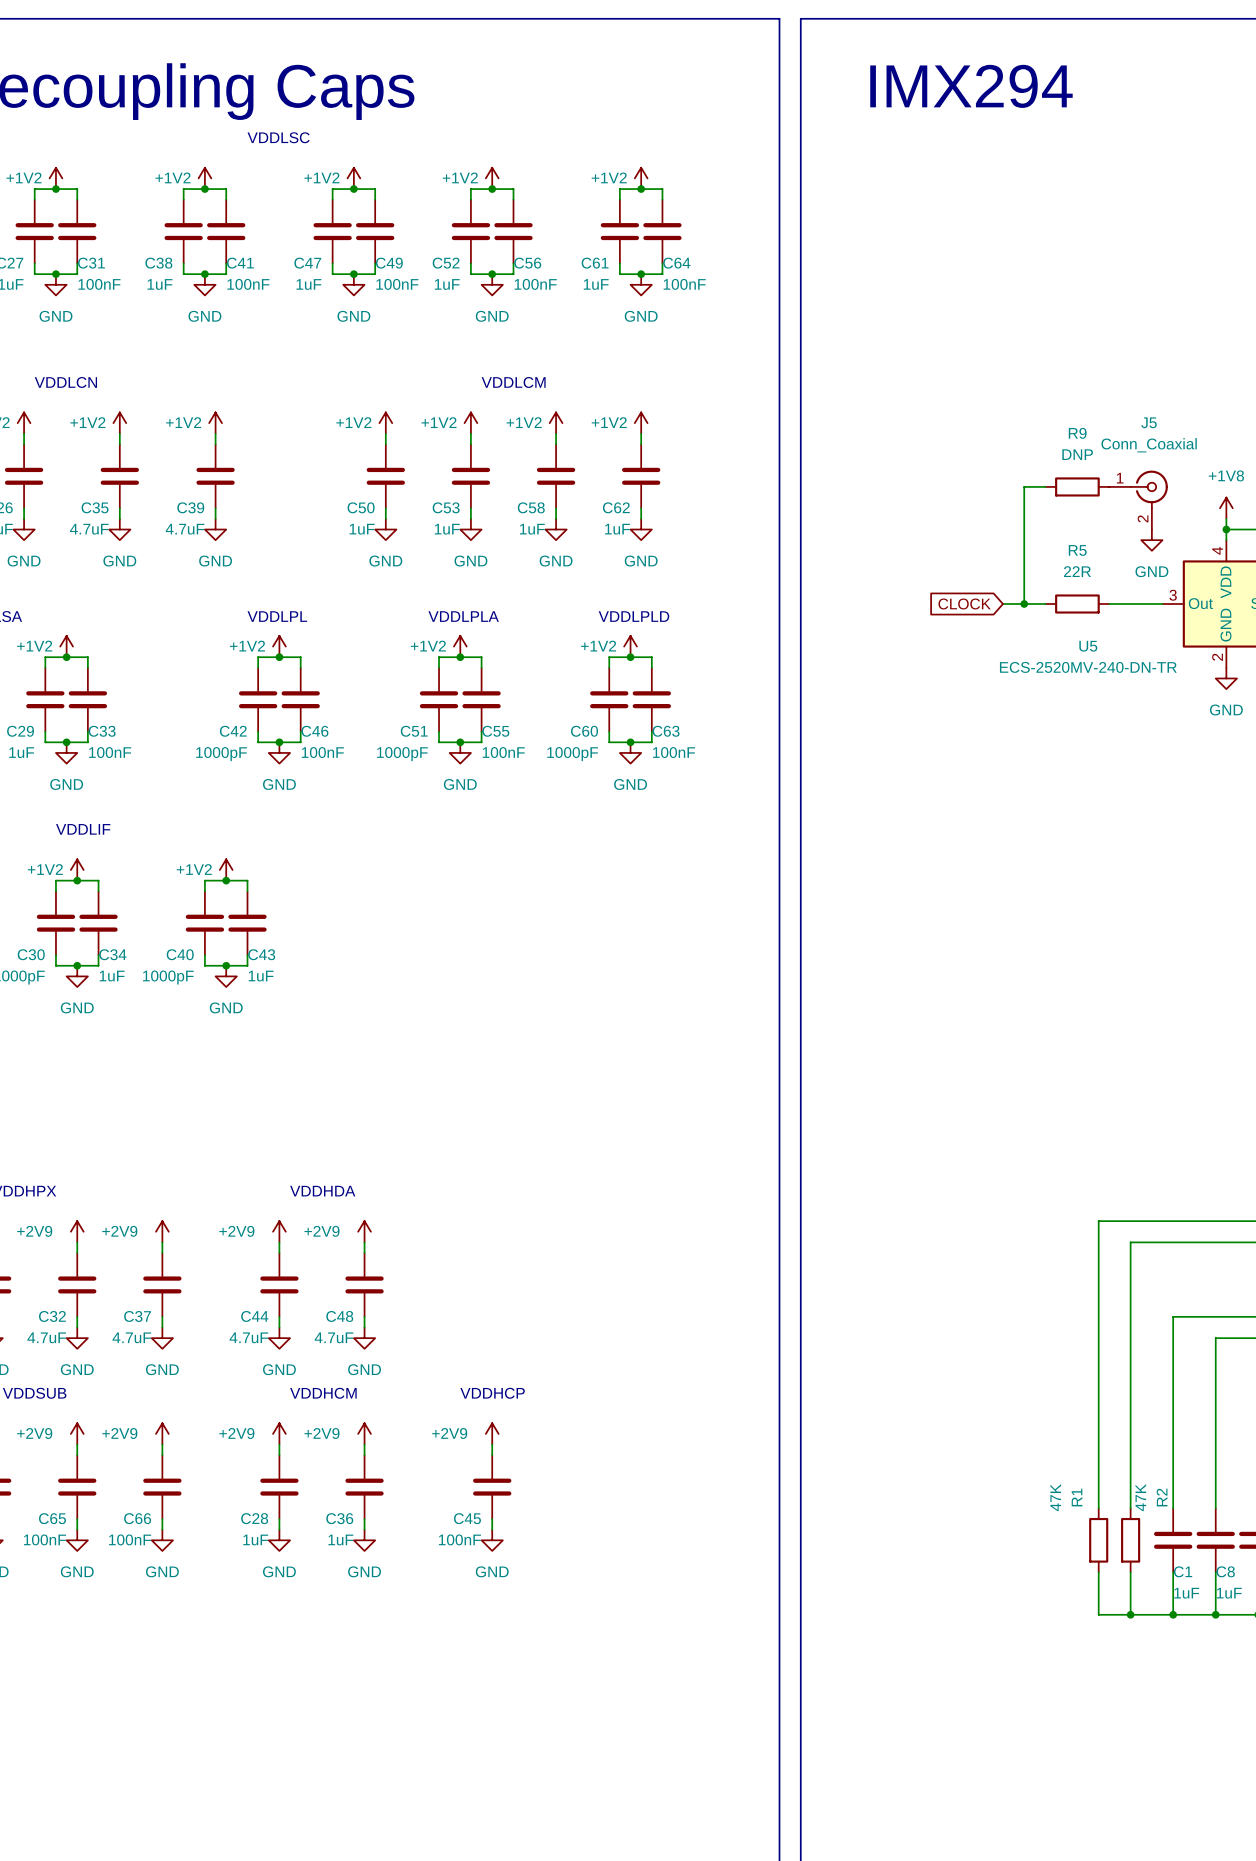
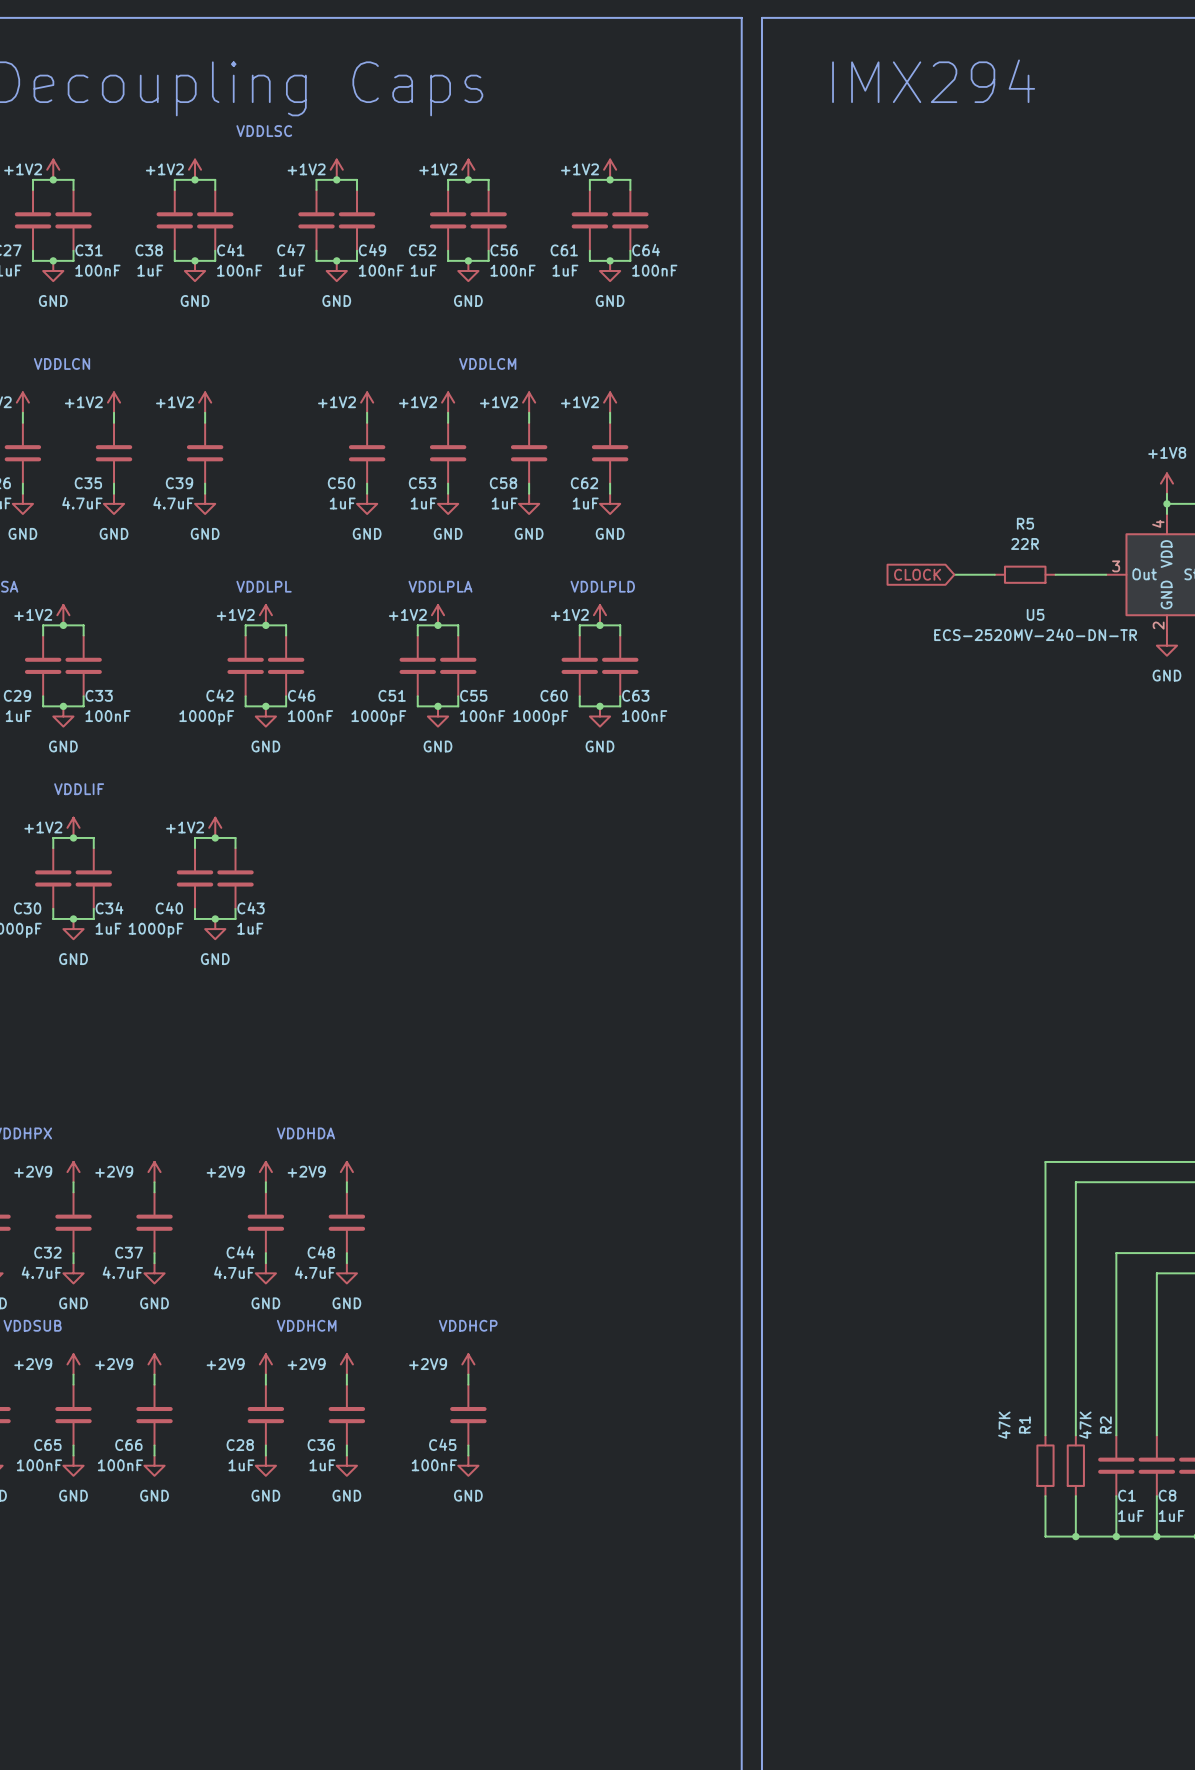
wire: (1045, 486) (1024, 486) (1024, 604) -> none
R9: DNP (1077, 486) -> none
J5: Conn_Coaxial (1138, 500) -> none
power symbol: GND (1151, 540) -> none
junction: (1024, 604) -> none

